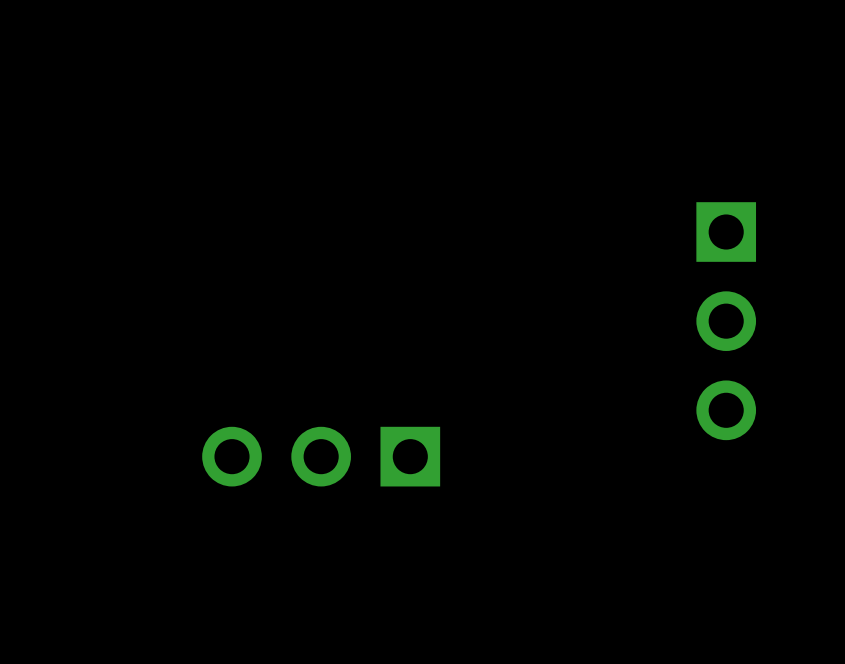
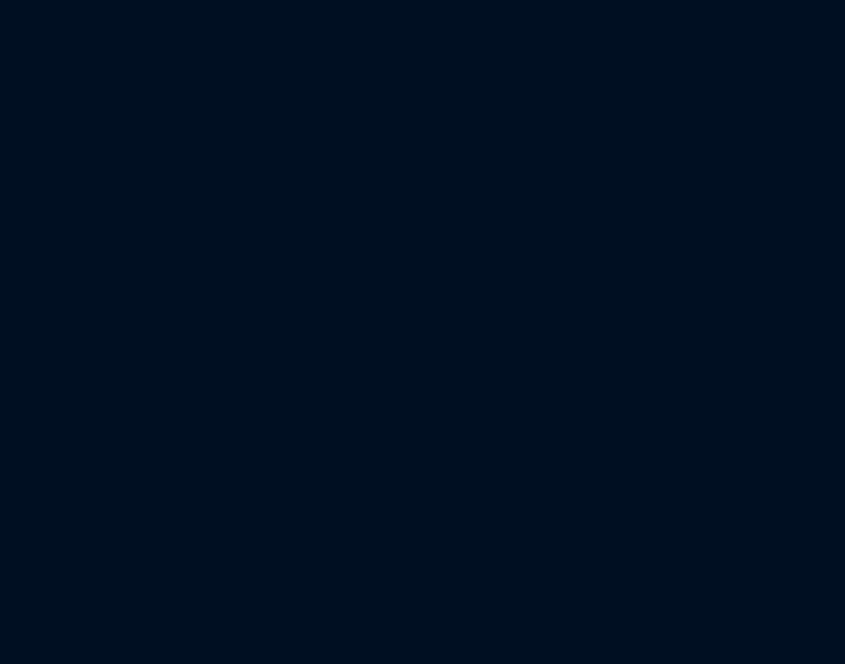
part: (726, 321) -> none
part: (321, 456) -> none

